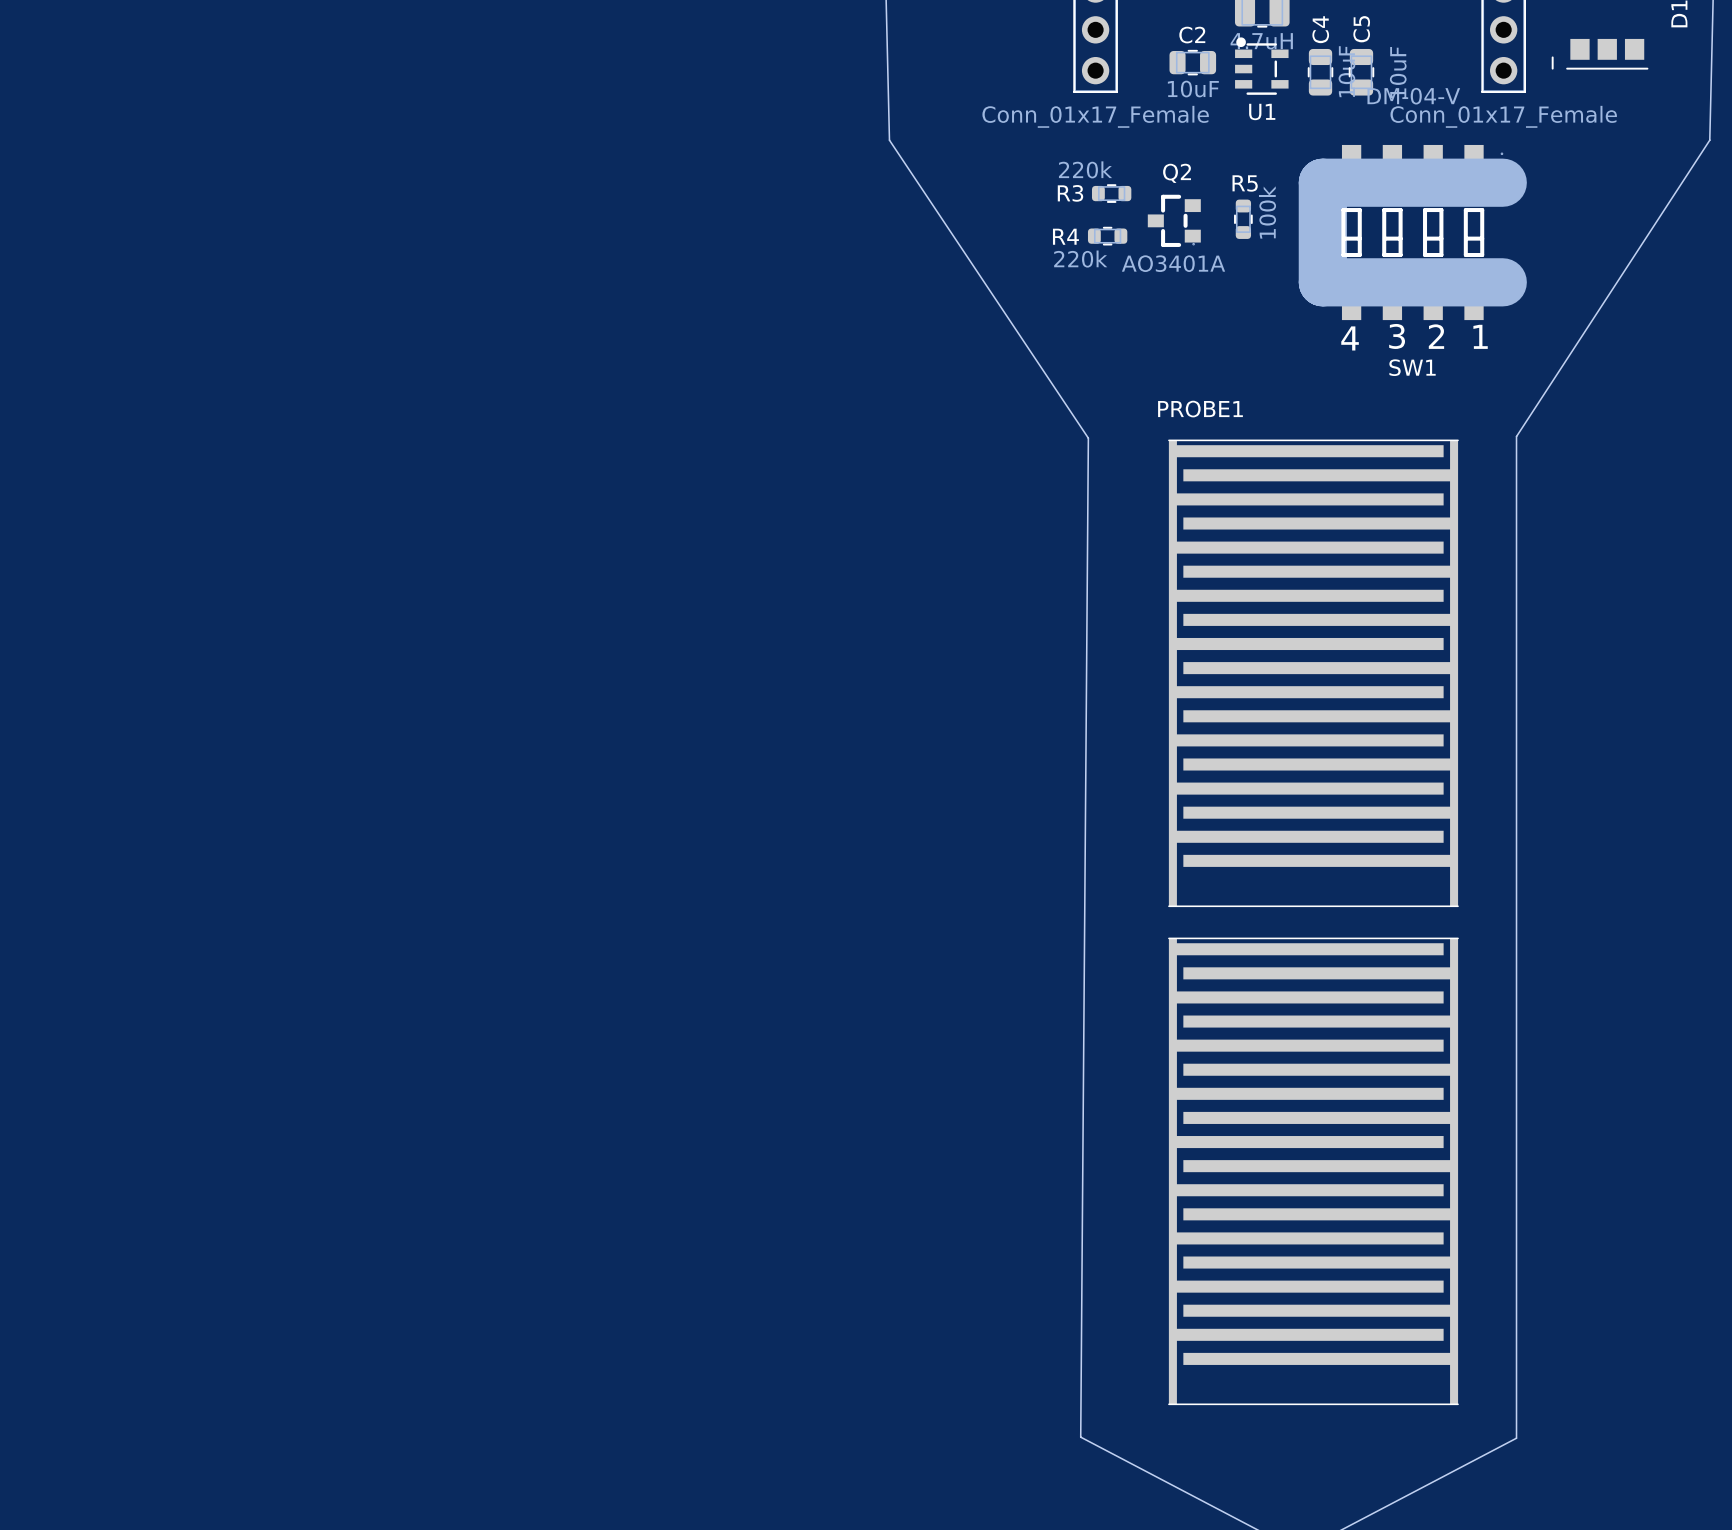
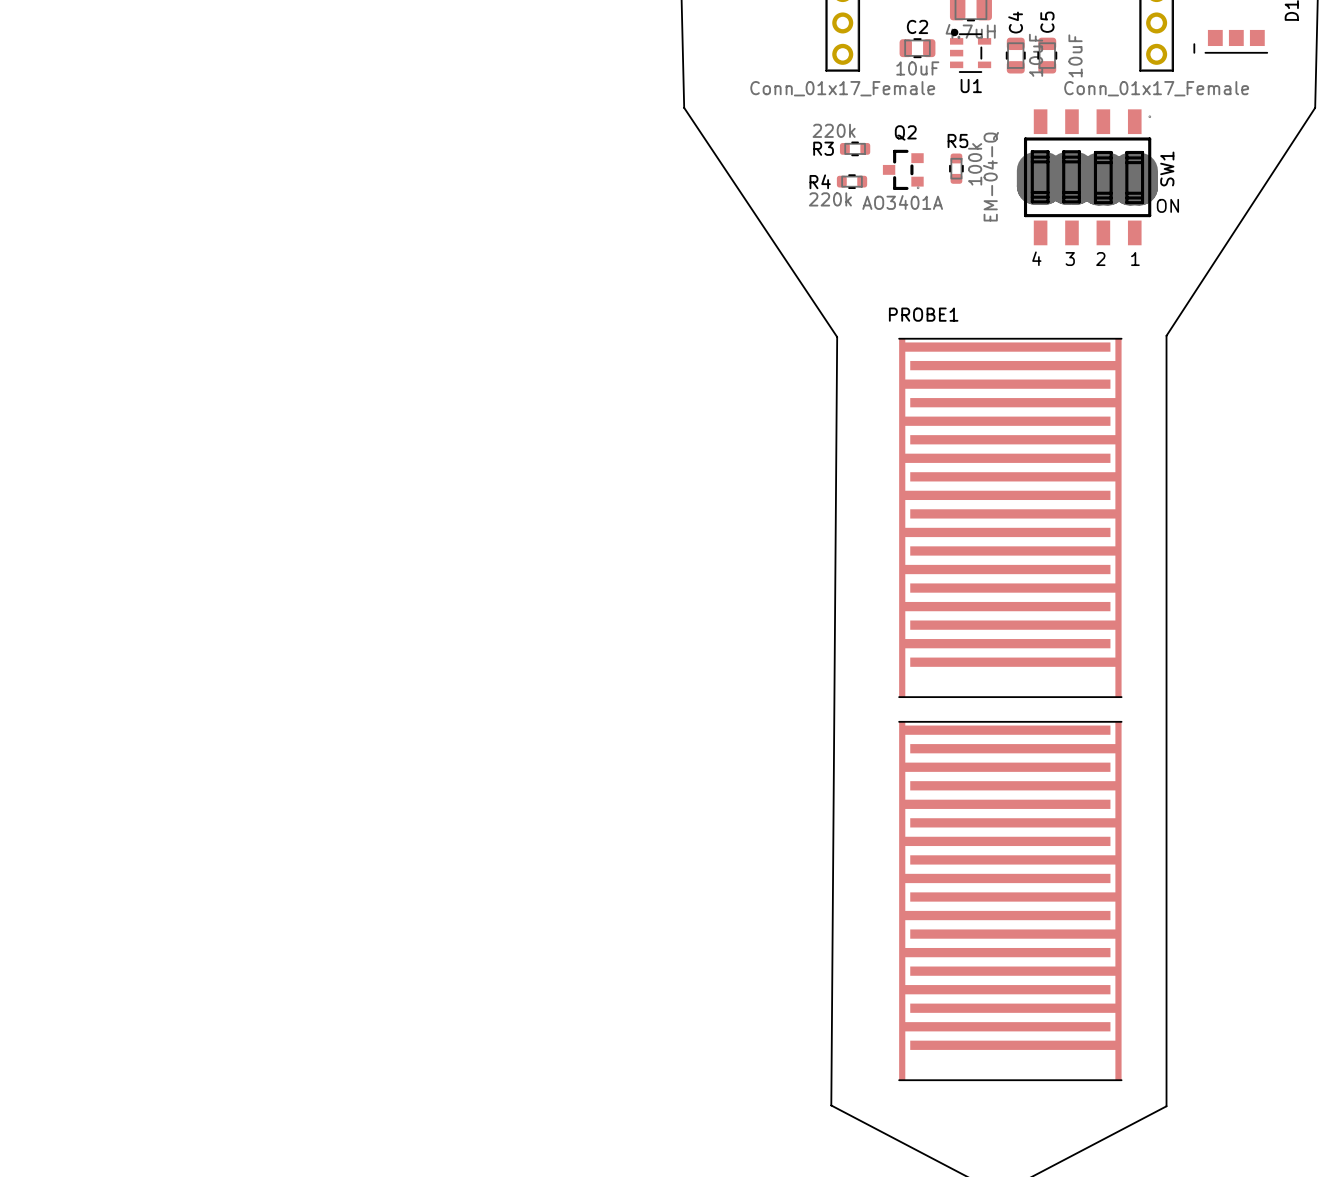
SW1 value: DM-04-V (1413, 96) -> EM-04-Q (990, 176)
SW1 footprint: [1298, 144, 1527, 321] -> [1016, 109, 1158, 246]
SW1 name position: SW1 (1412, 367) -> SW1 (1167, 168)

